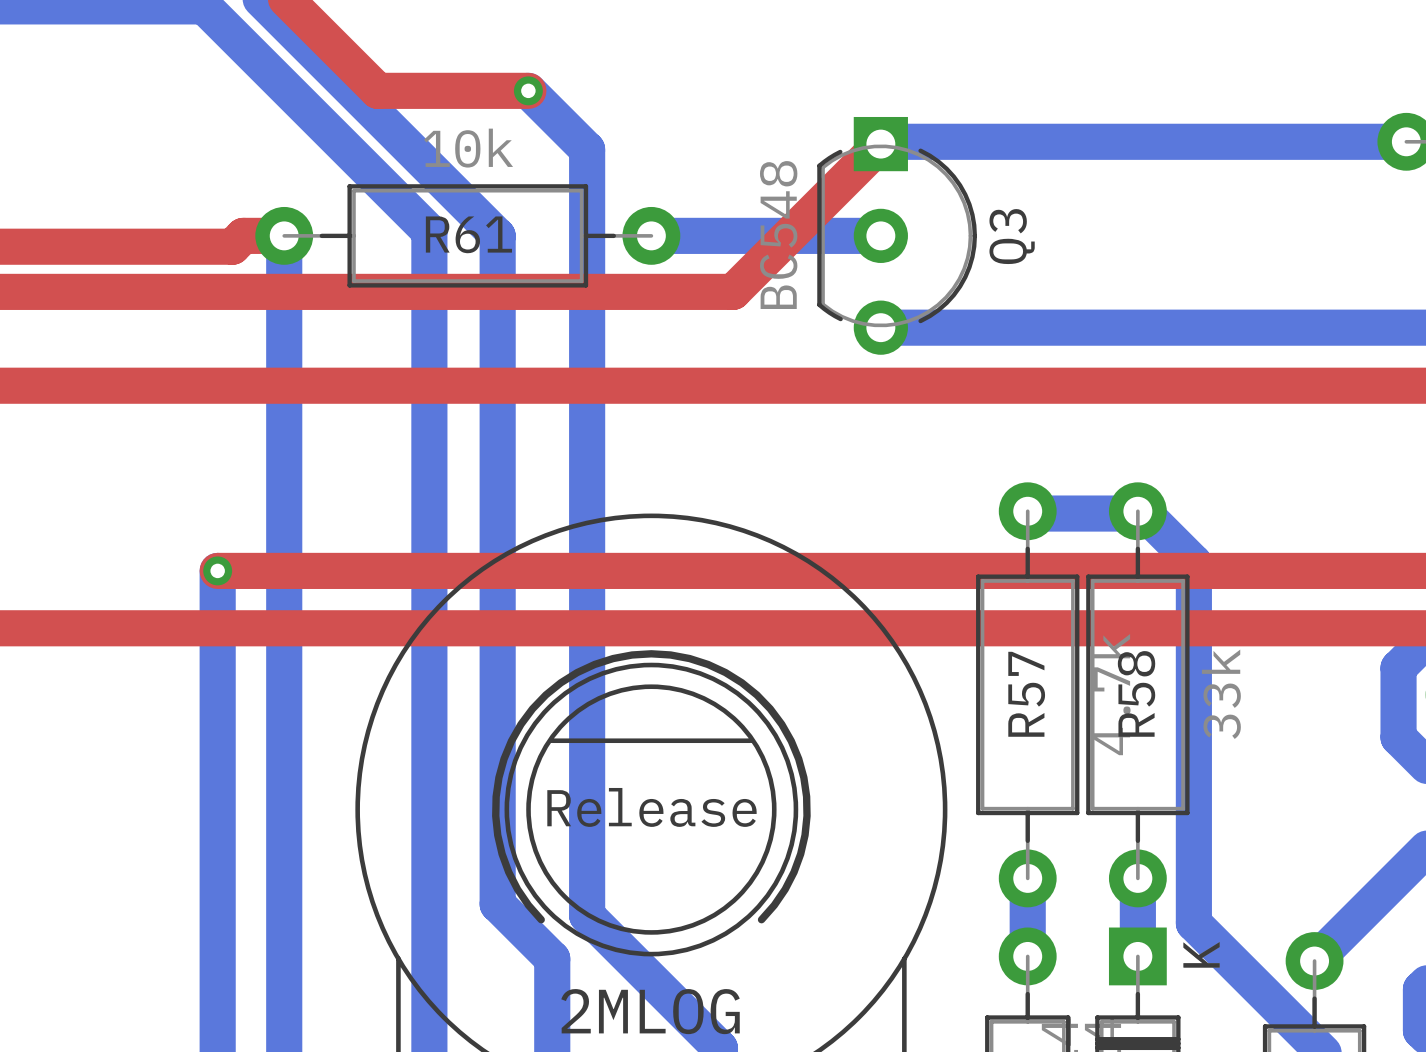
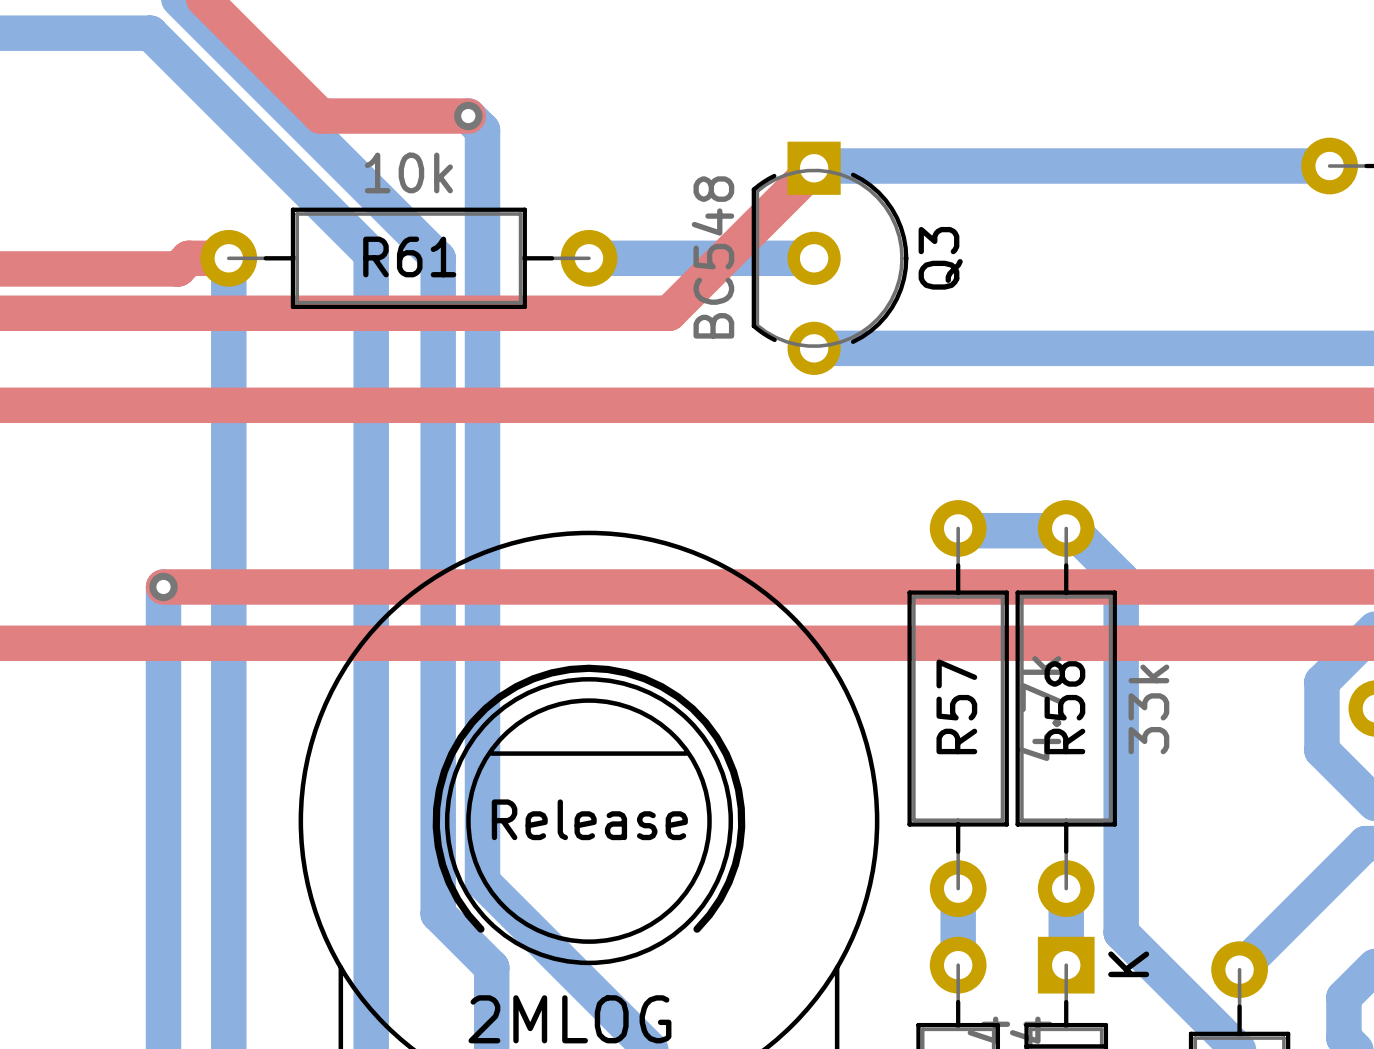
bottom track: (542, 105) (587, 149) (587, 915) -> (482, 130) (482, 881) (525, 925)

